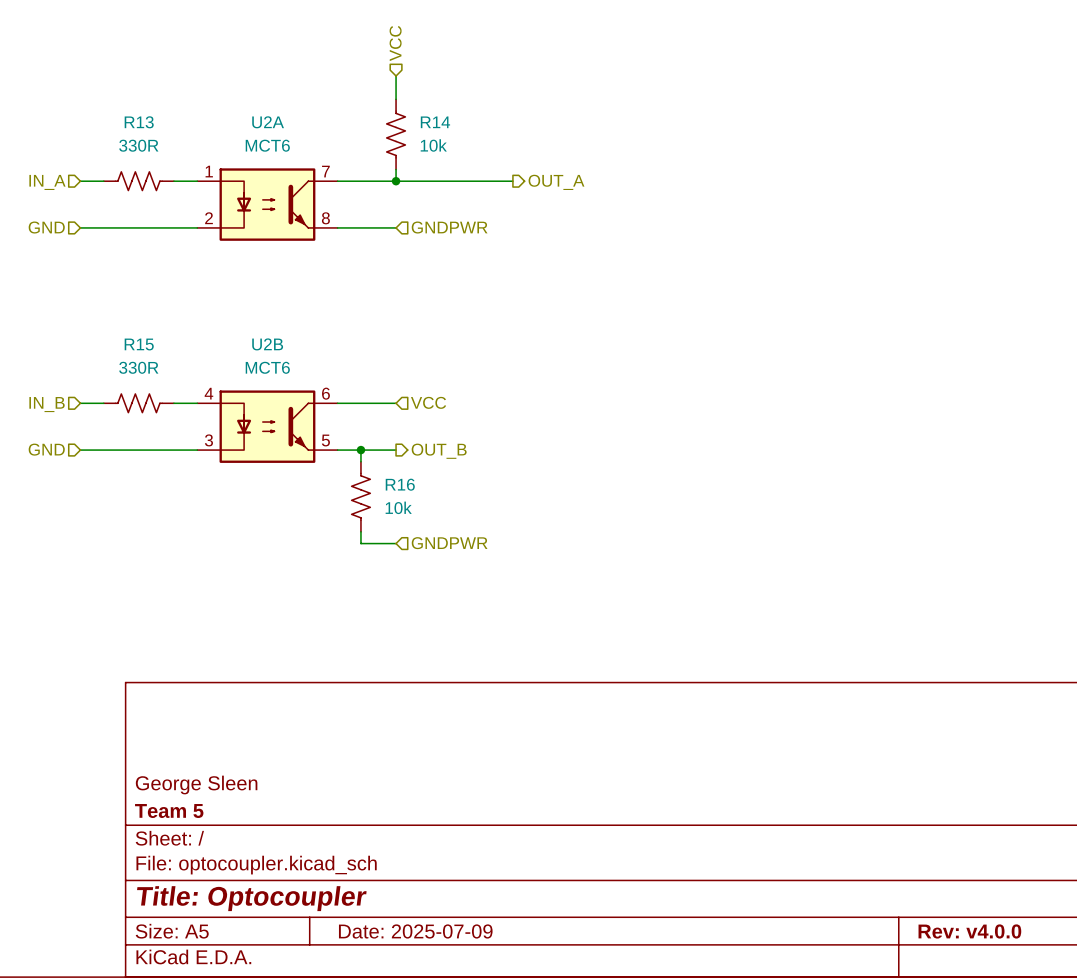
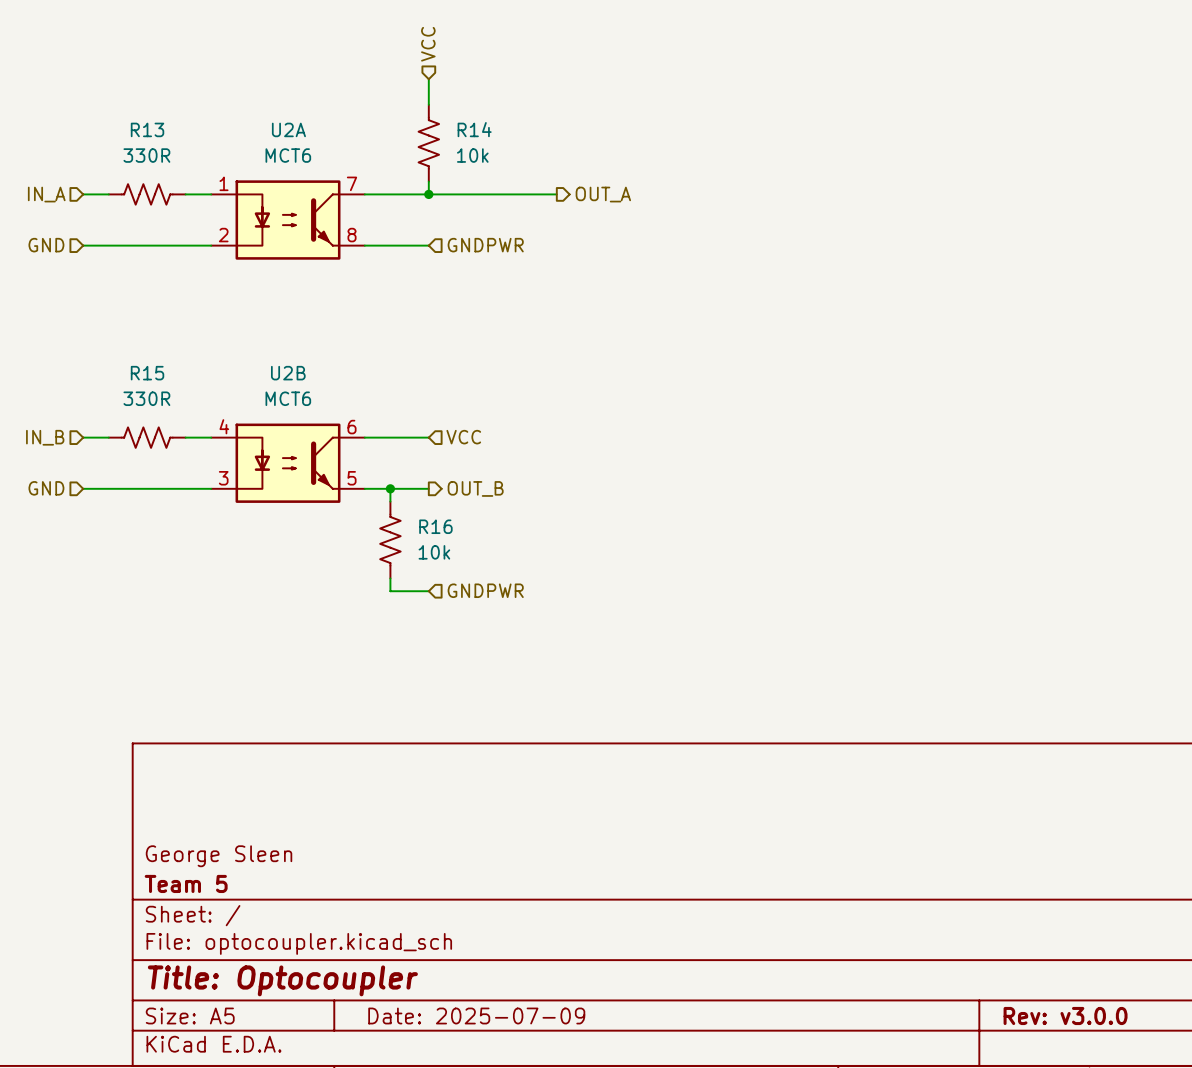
title block: Rev: v4.0.0 (969, 931) -> Rev: v3.0.0 (1065, 1015)

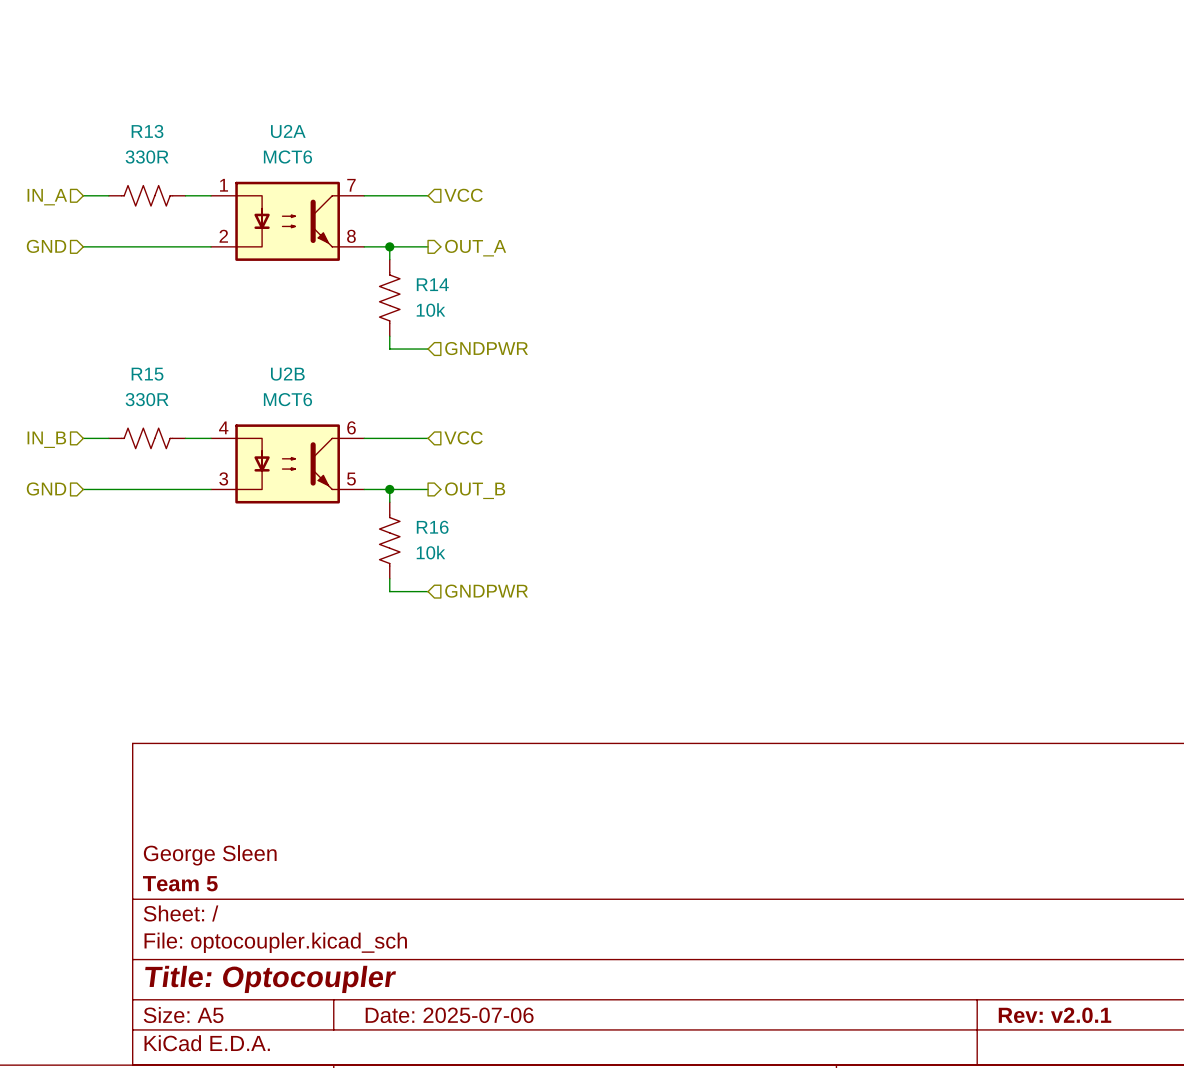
hierarchical label rotation: 0° (428, 44) -> 90° clockwise (463, 195)
hierarchical label position: VCC (428, 44) -> VCC (463, 195)
wire: (428, 79) (428, 104) -> none
R14 position: (428, 143) -> (389, 297)
wire: (428, 181) (428, 194) (556, 194) -> none
junction: (428, 194) -> none
hierarchical label: OUT_A (603, 194) -> none
wire: none -> (389, 246) (389, 259)
junction: none -> (389, 246)
hierarchical label shape: input (485, 245) -> output (475, 248)
hierarchical label: GNDPWR (485, 245) -> OUT_A (475, 248)
wire: none -> (389, 336) (389, 349) (428, 349)
hierarchical label: none -> GNDPWR (486, 348)
title block: Date: 2025-07-09 (476, 1015) -> Date: 2025-07-06 (449, 1015)
title block: Rev: v3.0.0 (1065, 1015) -> Rev: v2.0.1 (1055, 1015)

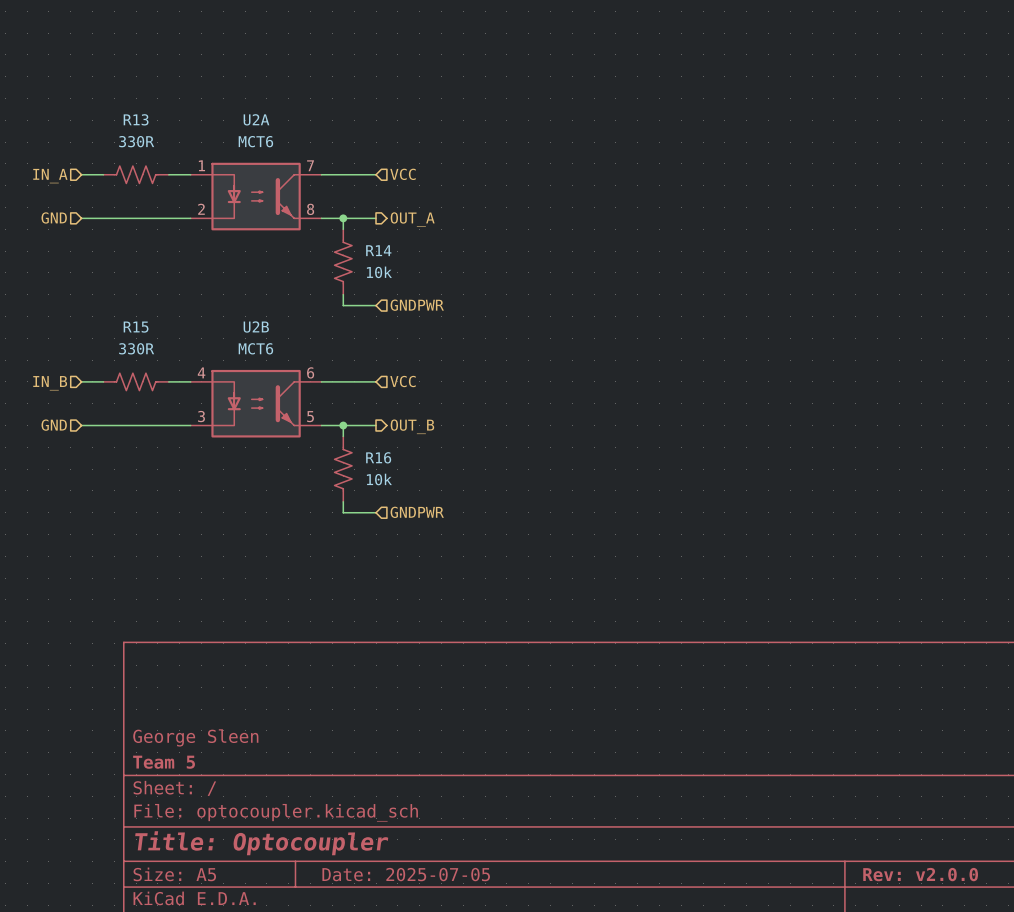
title block: Date: 2025-07-06 (449, 1015) -> Date: 2025-07-05 (406, 874)
title block: Rev: v2.0.1 (1055, 1015) -> Rev: v2.0.0 (920, 874)

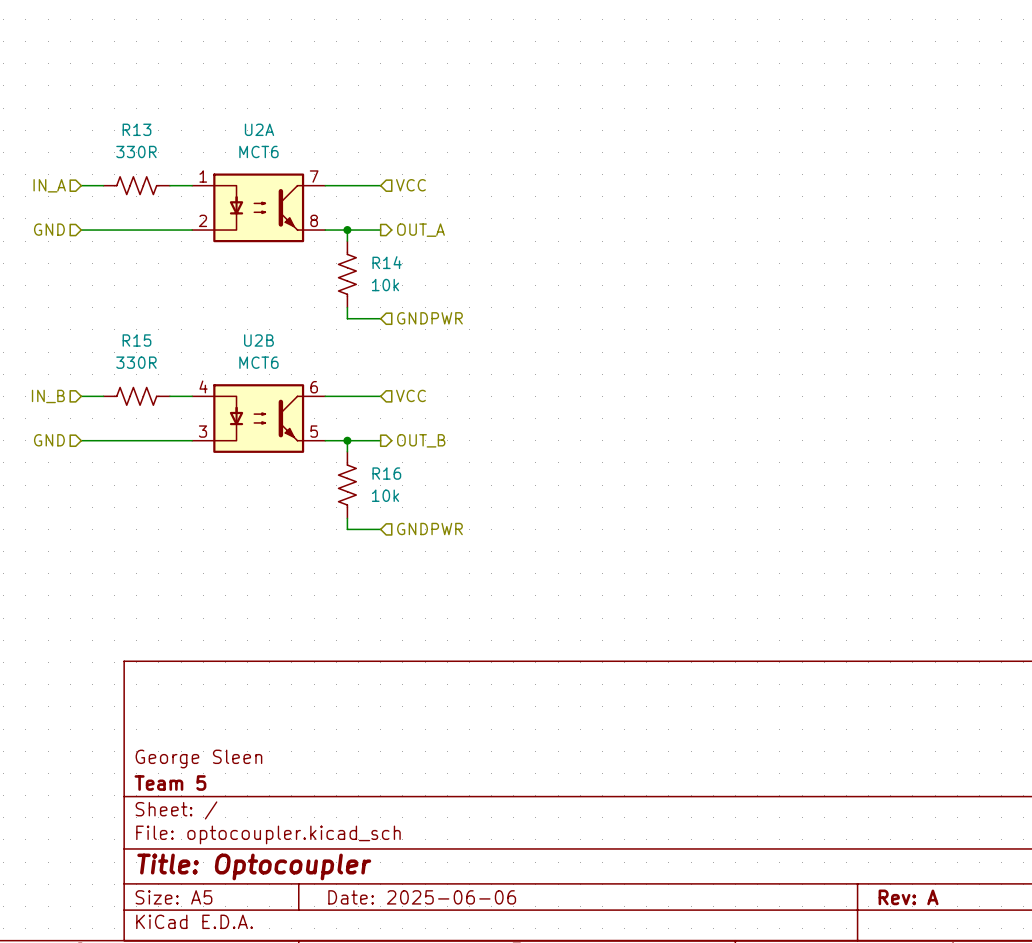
title block: Date: 2025-07-05 (406, 874) -> Date: 2025-06-06 (422, 897)
title block: Rev: v2.0.0 (920, 874) -> Rev: A (908, 897)

